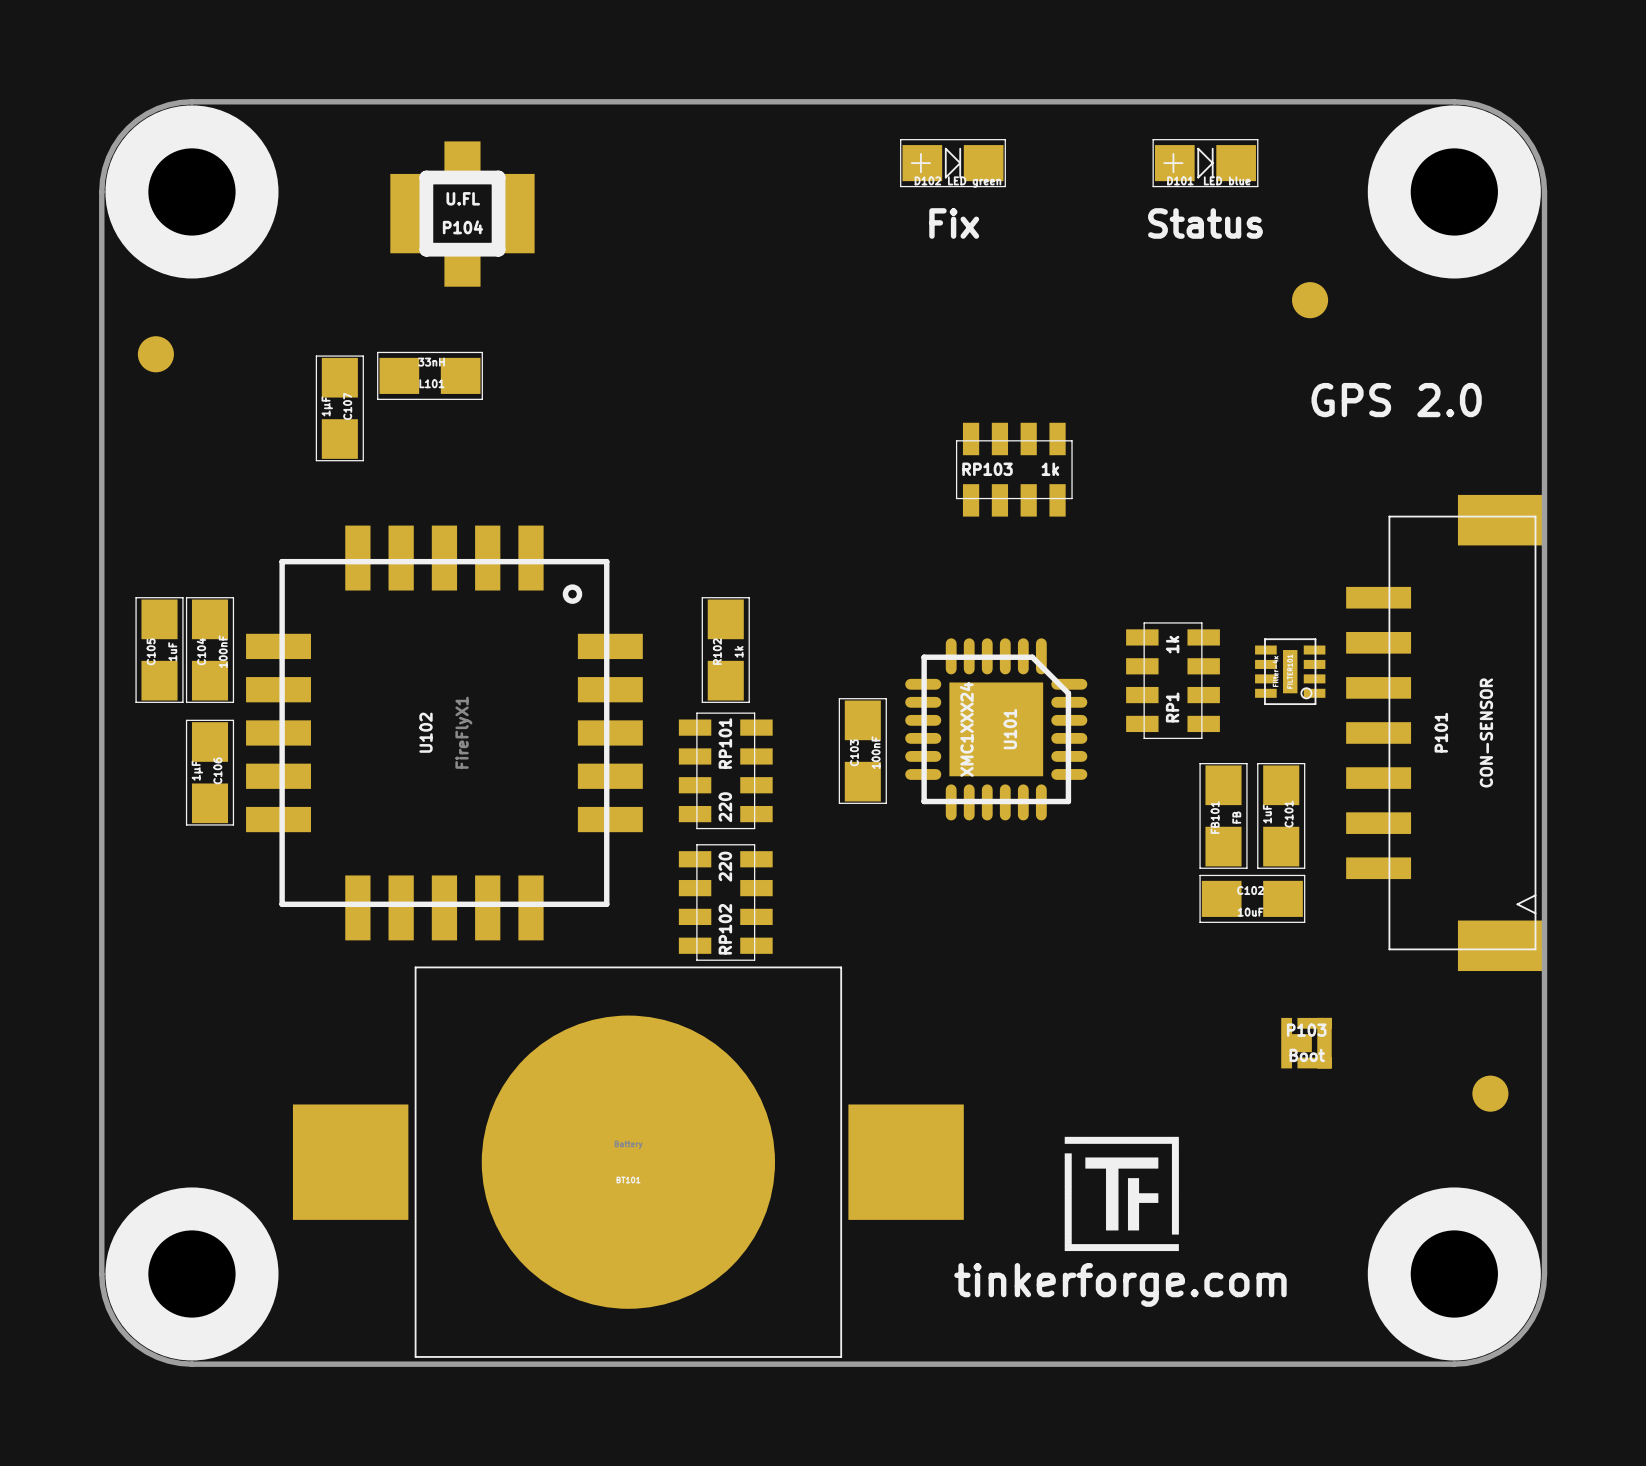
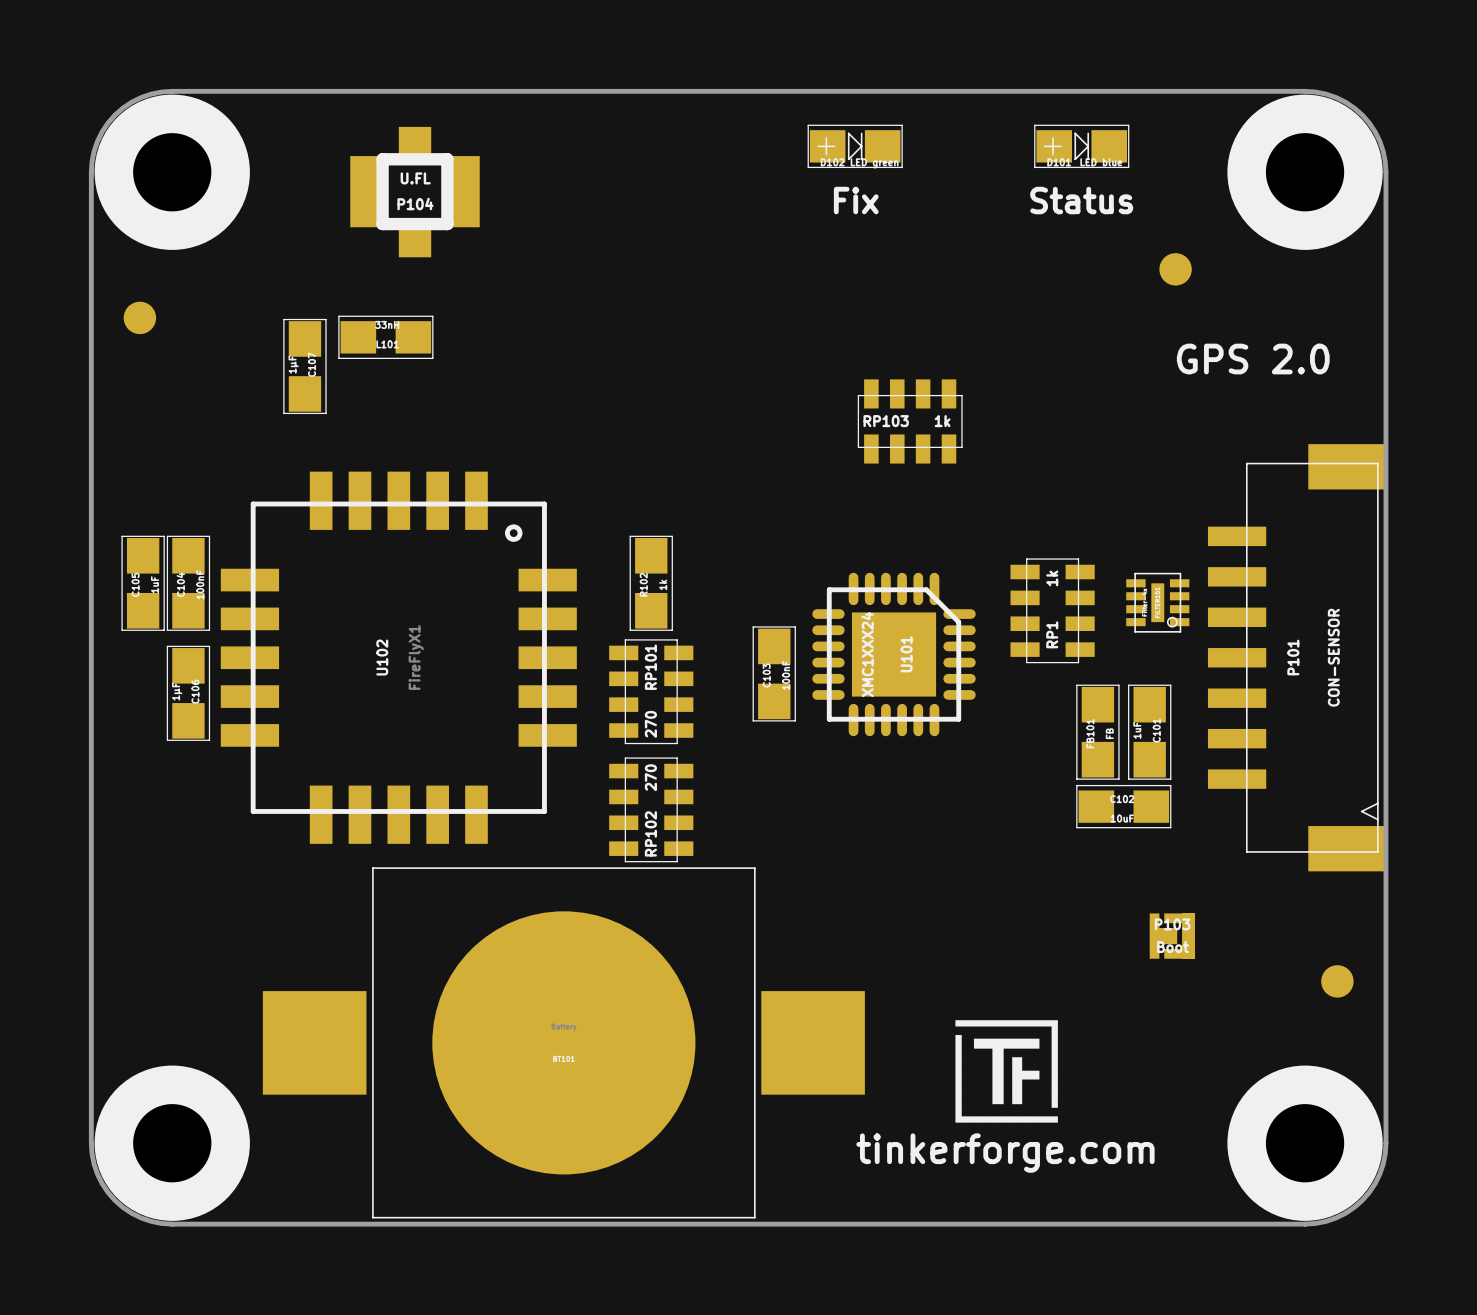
RP101 value: 220 (725, 807) -> 270 (650, 724)
RP102 value: 220 (725, 866) -> 270 (650, 777)

